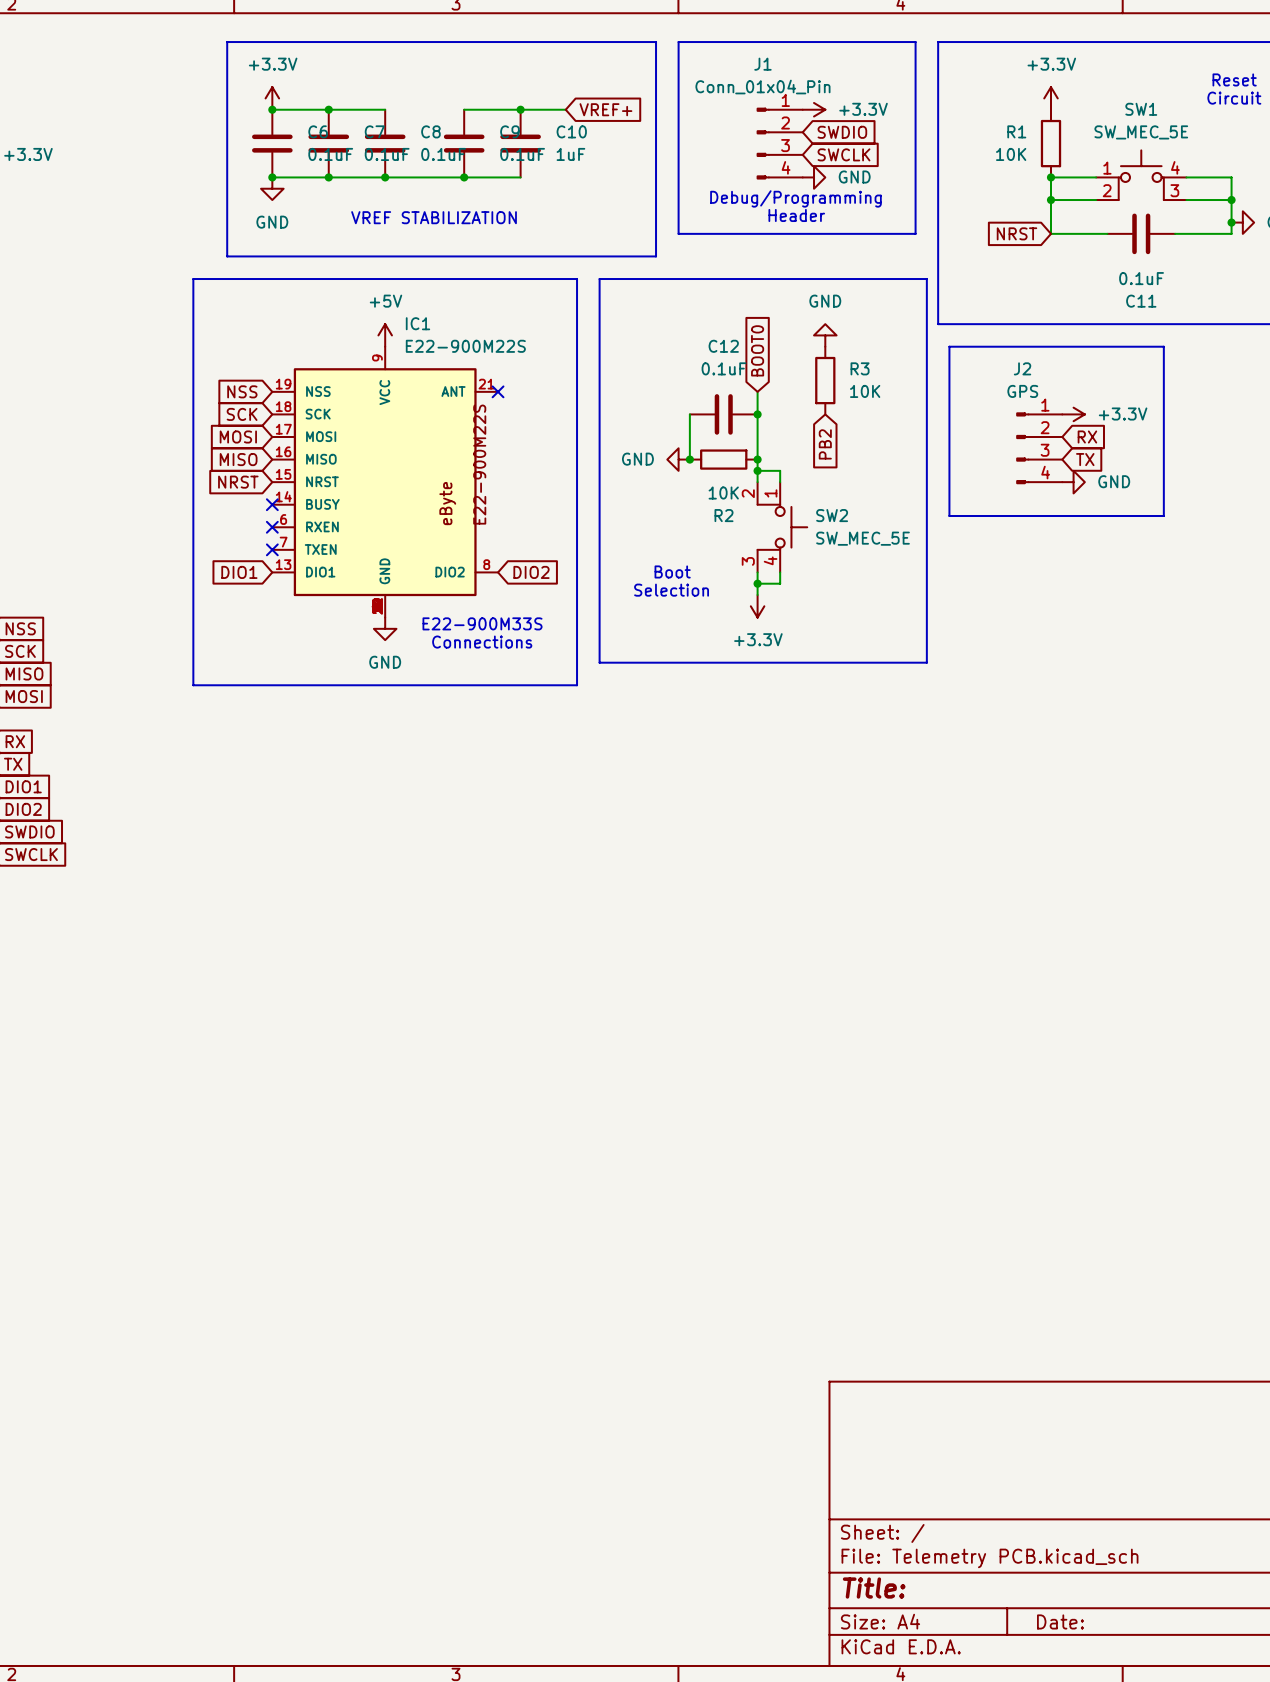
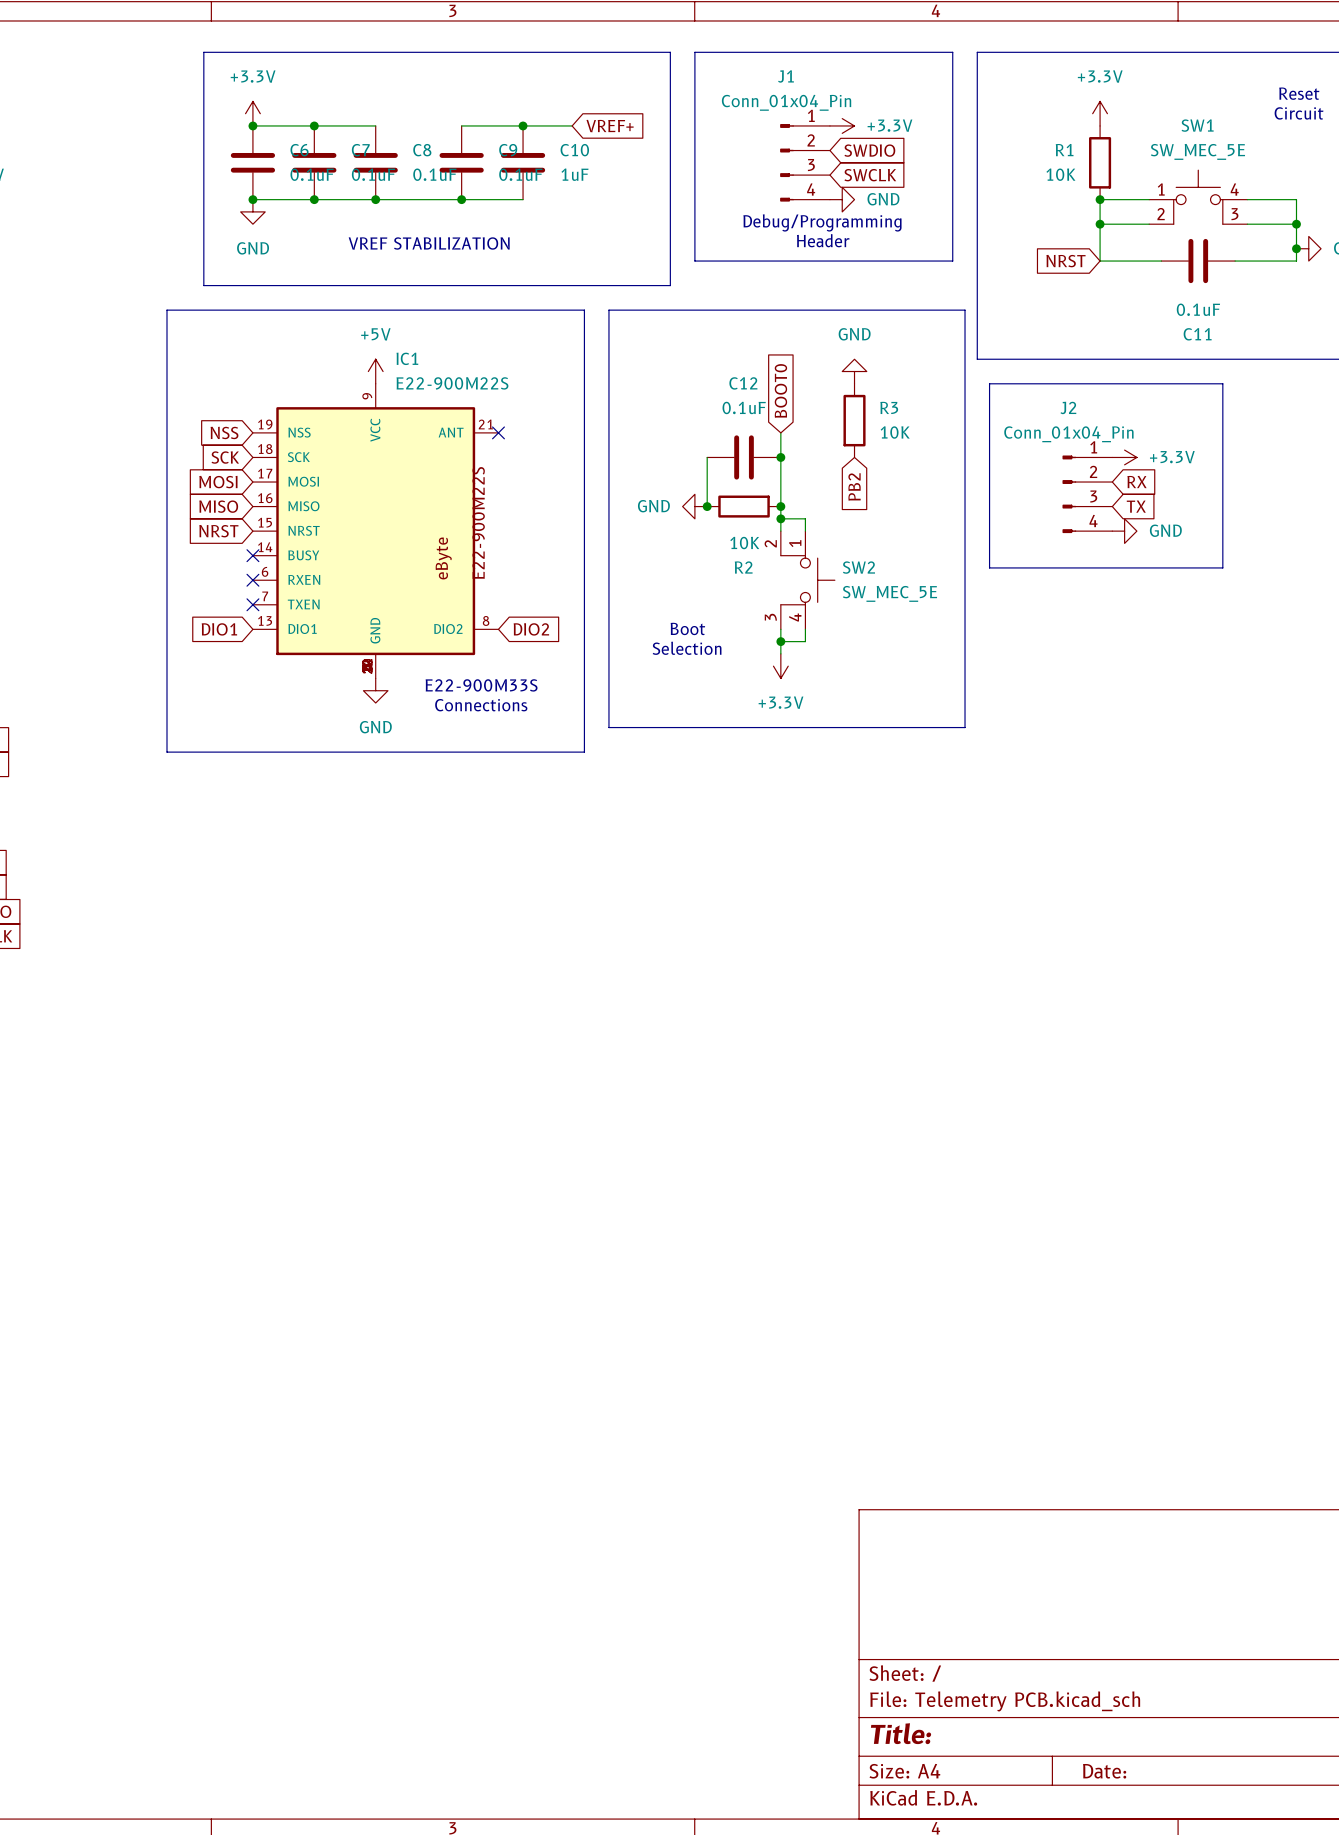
J2 value: GPS (1022, 391) -> Conn_01x04_Pin (1068, 434)

